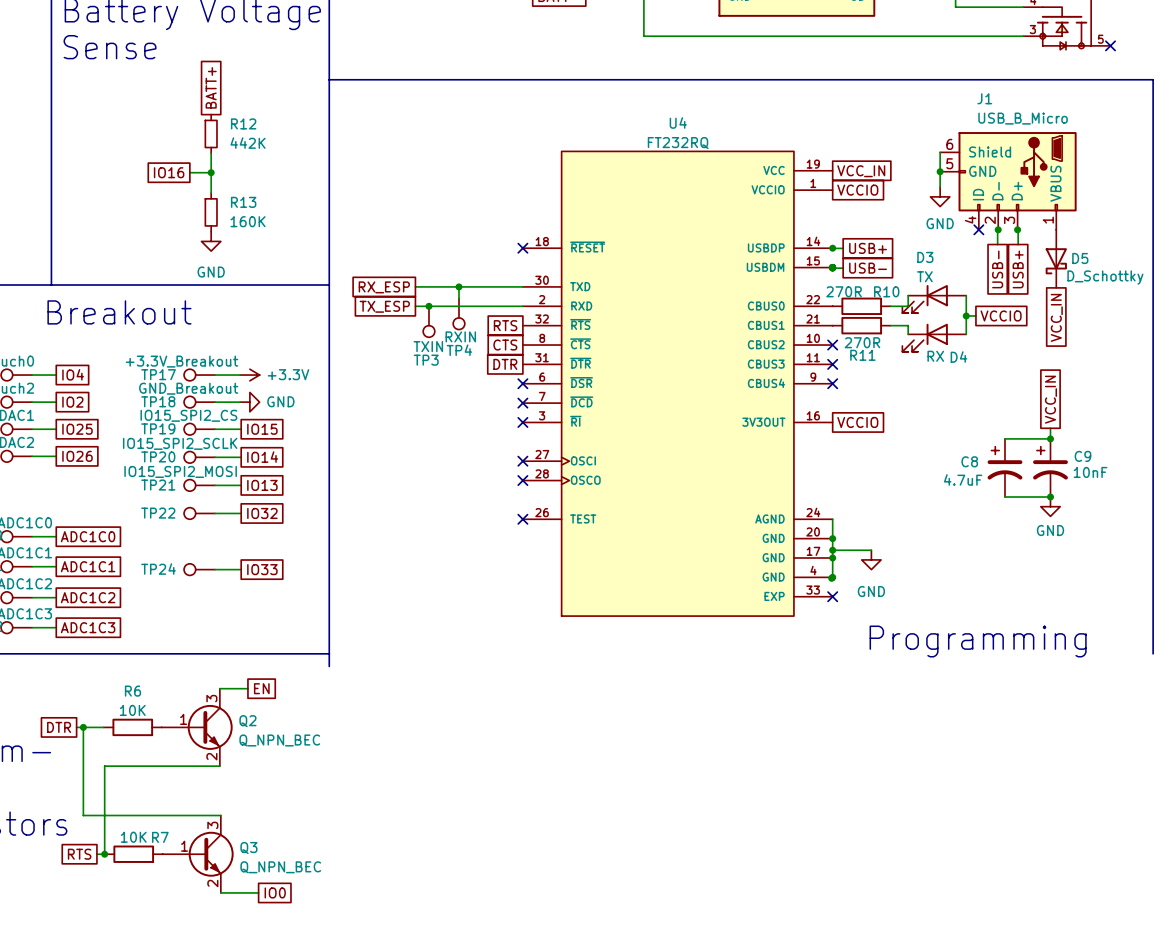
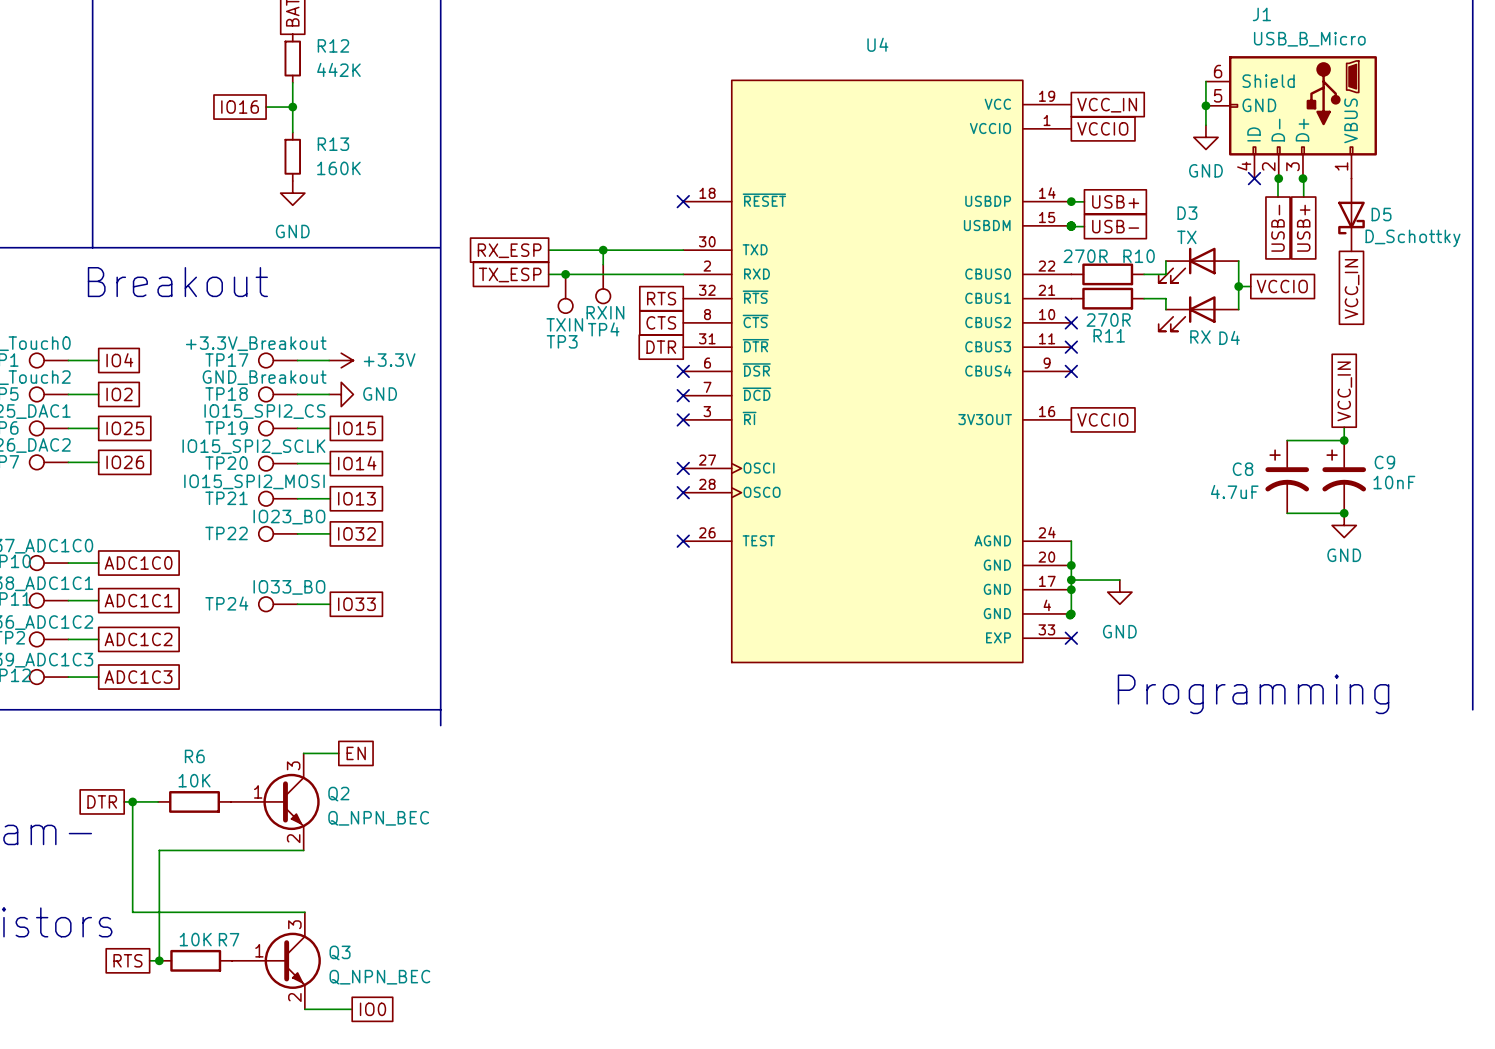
U4 value: FT232RQ (678, 143) -> none
TP22 value: none -> IO23_BO (289, 517)
TP24 value: none -> IO33_BO (289, 587)

